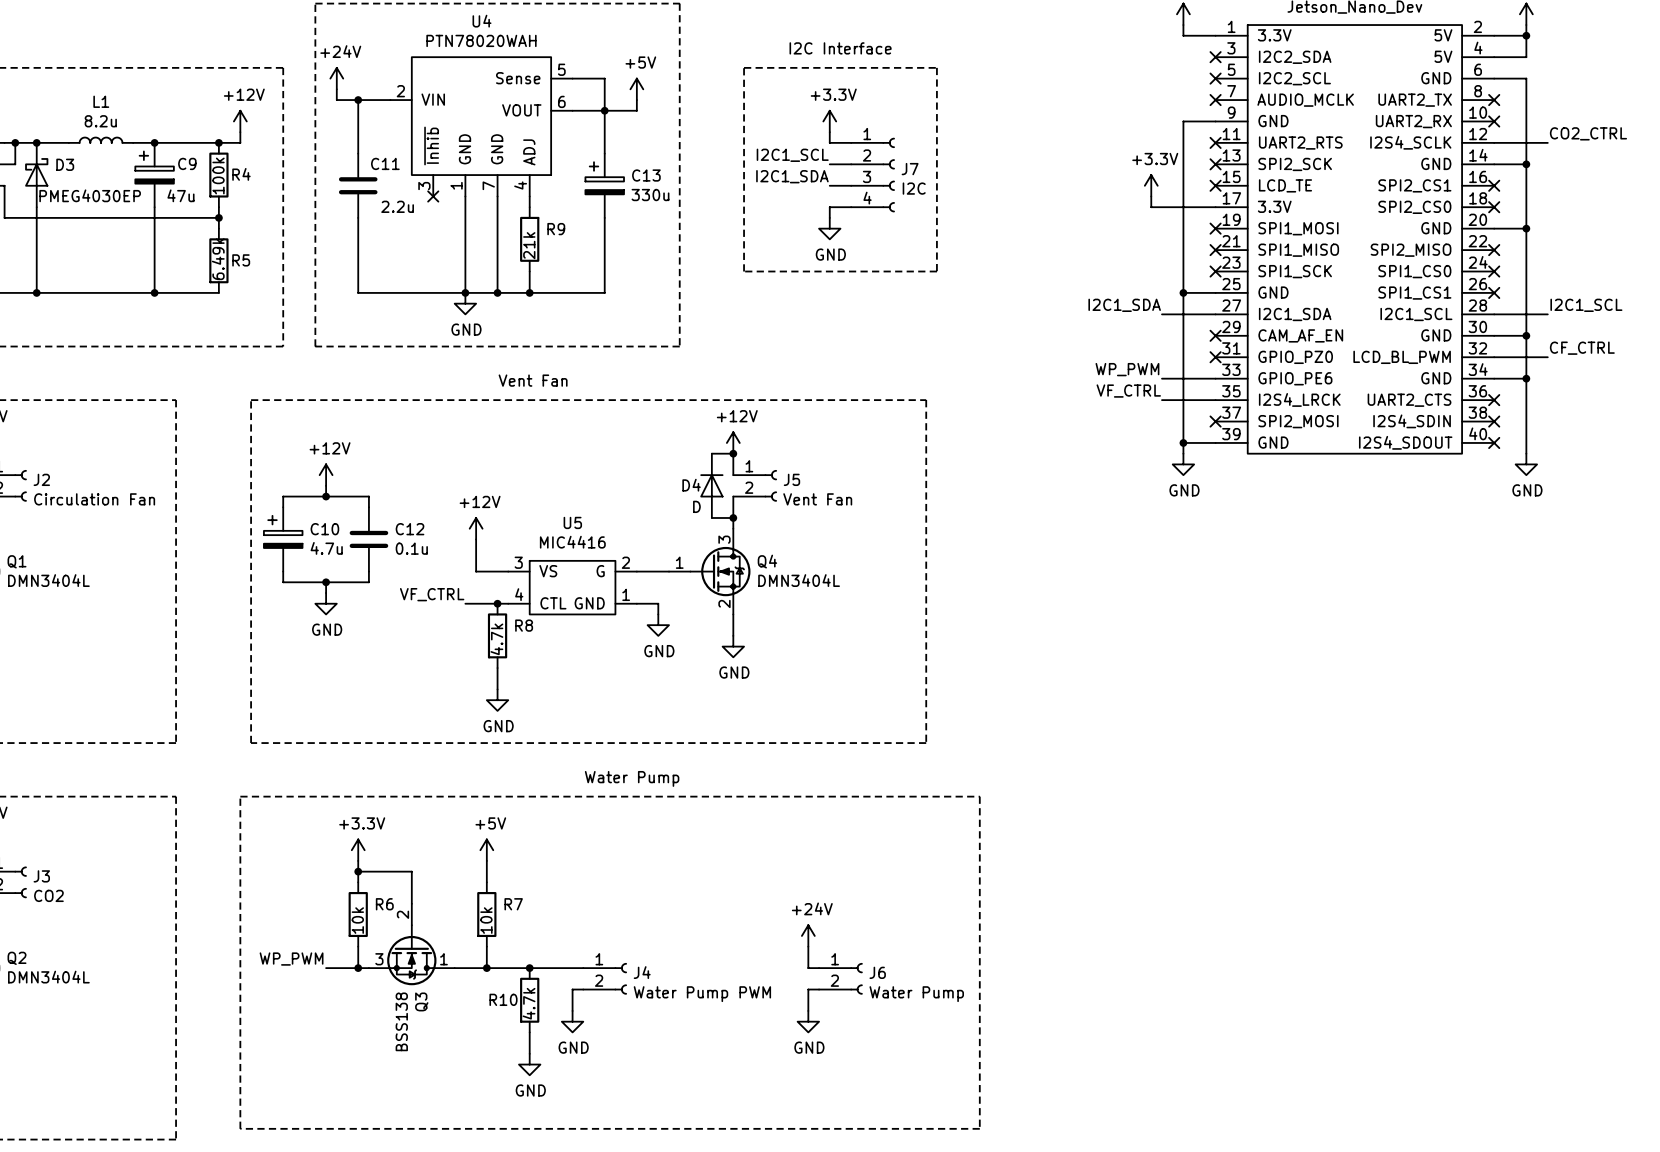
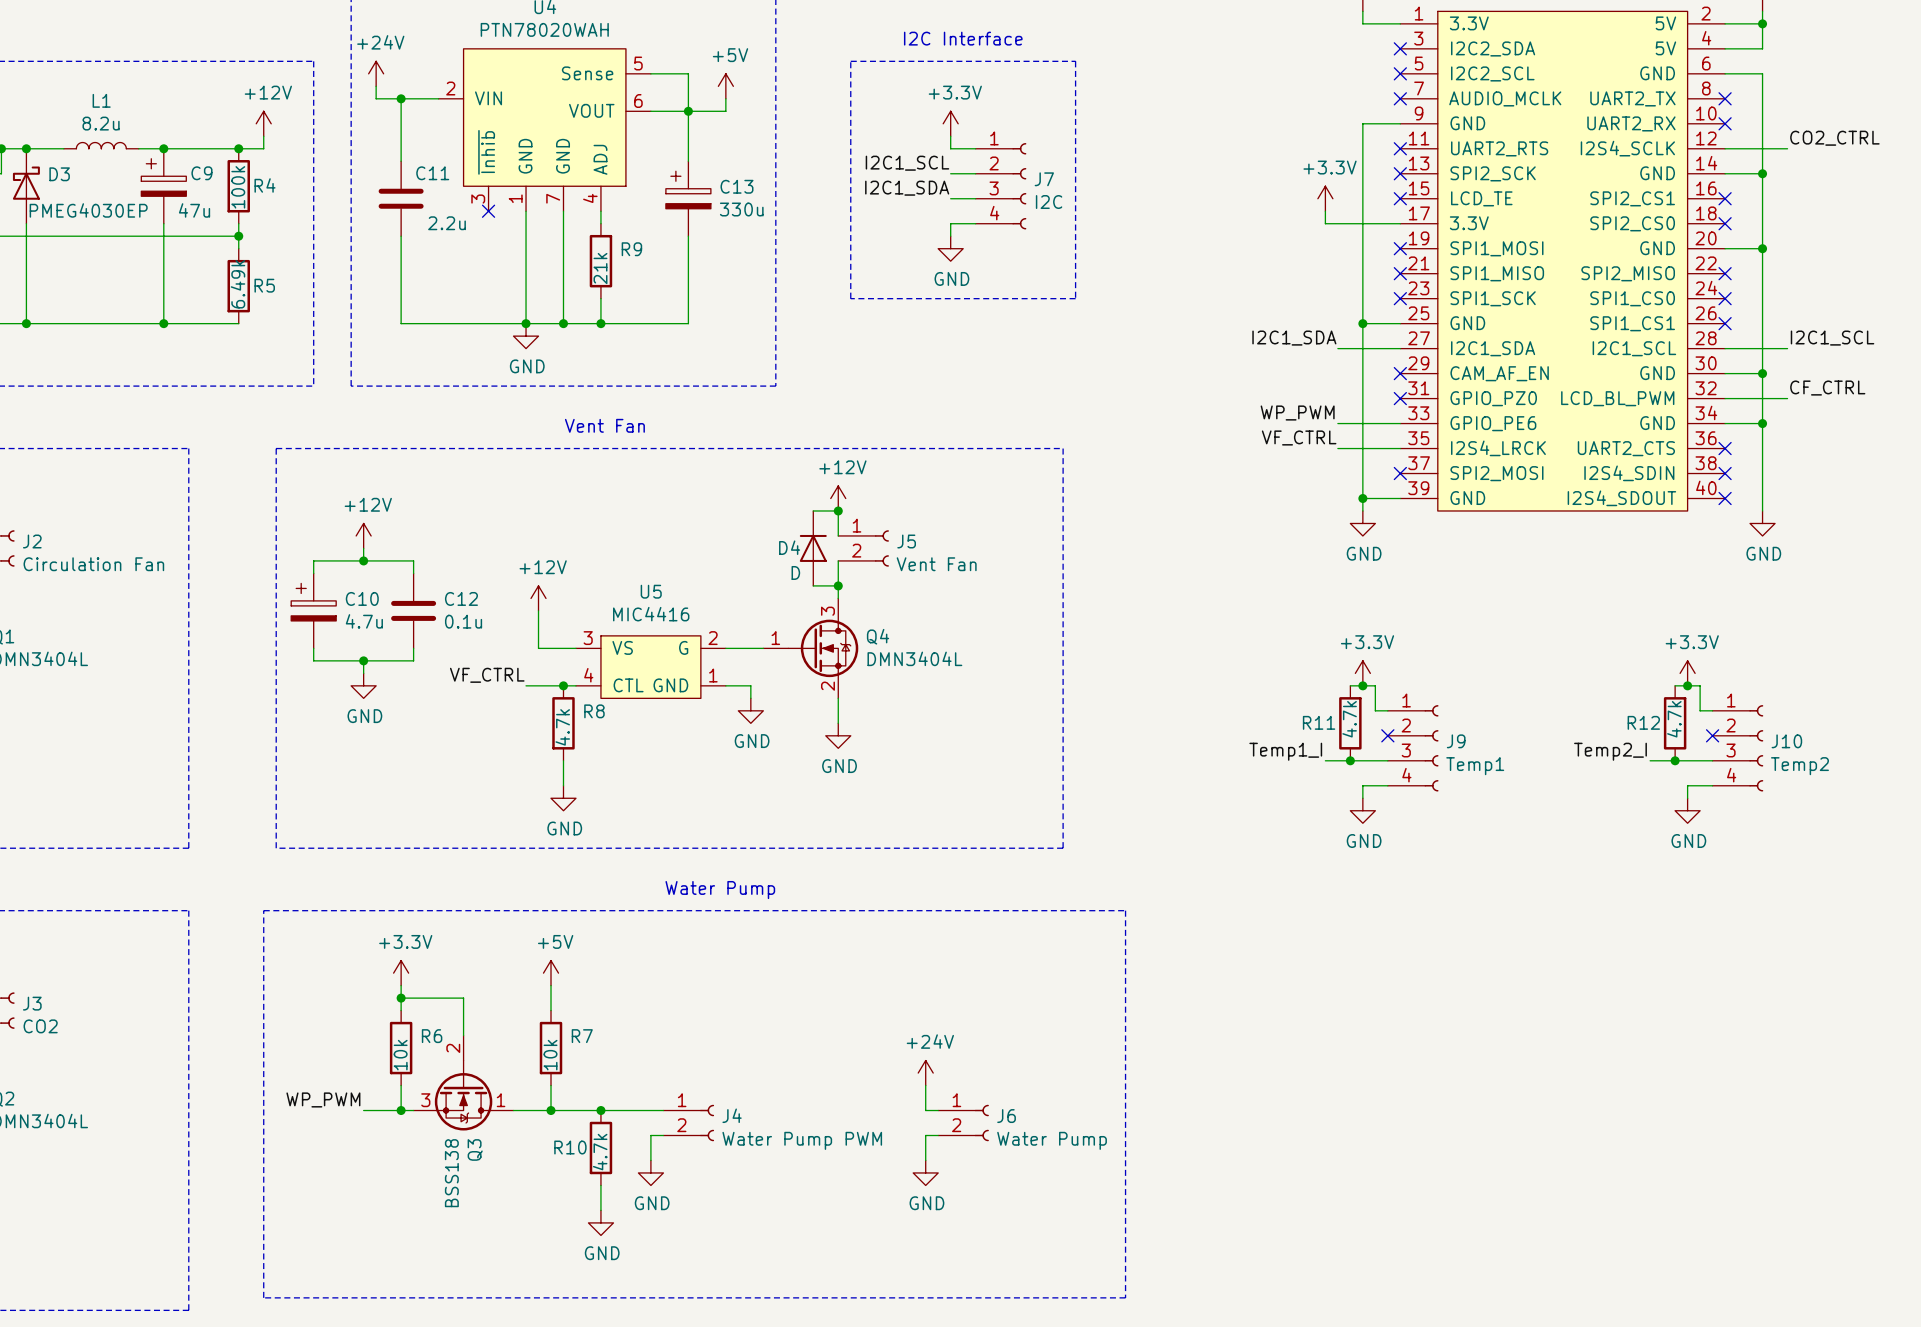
power symbol: none -> +3.3V (1362, 673)
power symbol: none -> +3.3V (1687, 673)
wire: none -> (1350, 685) (1375, 685) (1375, 710) (1387, 710)
junction: none -> (1362, 685)
wire: none -> (1675, 685) (1700, 685) (1700, 710) (1712, 710)
junction: none -> (1687, 685)
R11: none -> 4.7k (1350, 723)
R12: none -> 4.7k (1675, 723)
no-connect mark: none -> (1387, 735)
no-connect mark: none -> (1712, 735)
J9: none -> Temp1 (1413, 748)
J10: none -> Temp2 (1737, 748)
label: none -> Temp1_I (1285, 751)
label: none -> Temp2_I (1610, 751)
wire: none -> (1325, 760) (1387, 760)
junction: none -> (1350, 760)
wire: none -> (1650, 760) (1712, 760)
junction: none -> (1675, 760)
wire: none -> (1387, 785) (1362, 785) (1362, 798)
wire: none -> (1712, 785) (1687, 785) (1687, 798)
power symbol: none -> GND (1362, 810)
power symbol: none -> GND (1687, 810)

